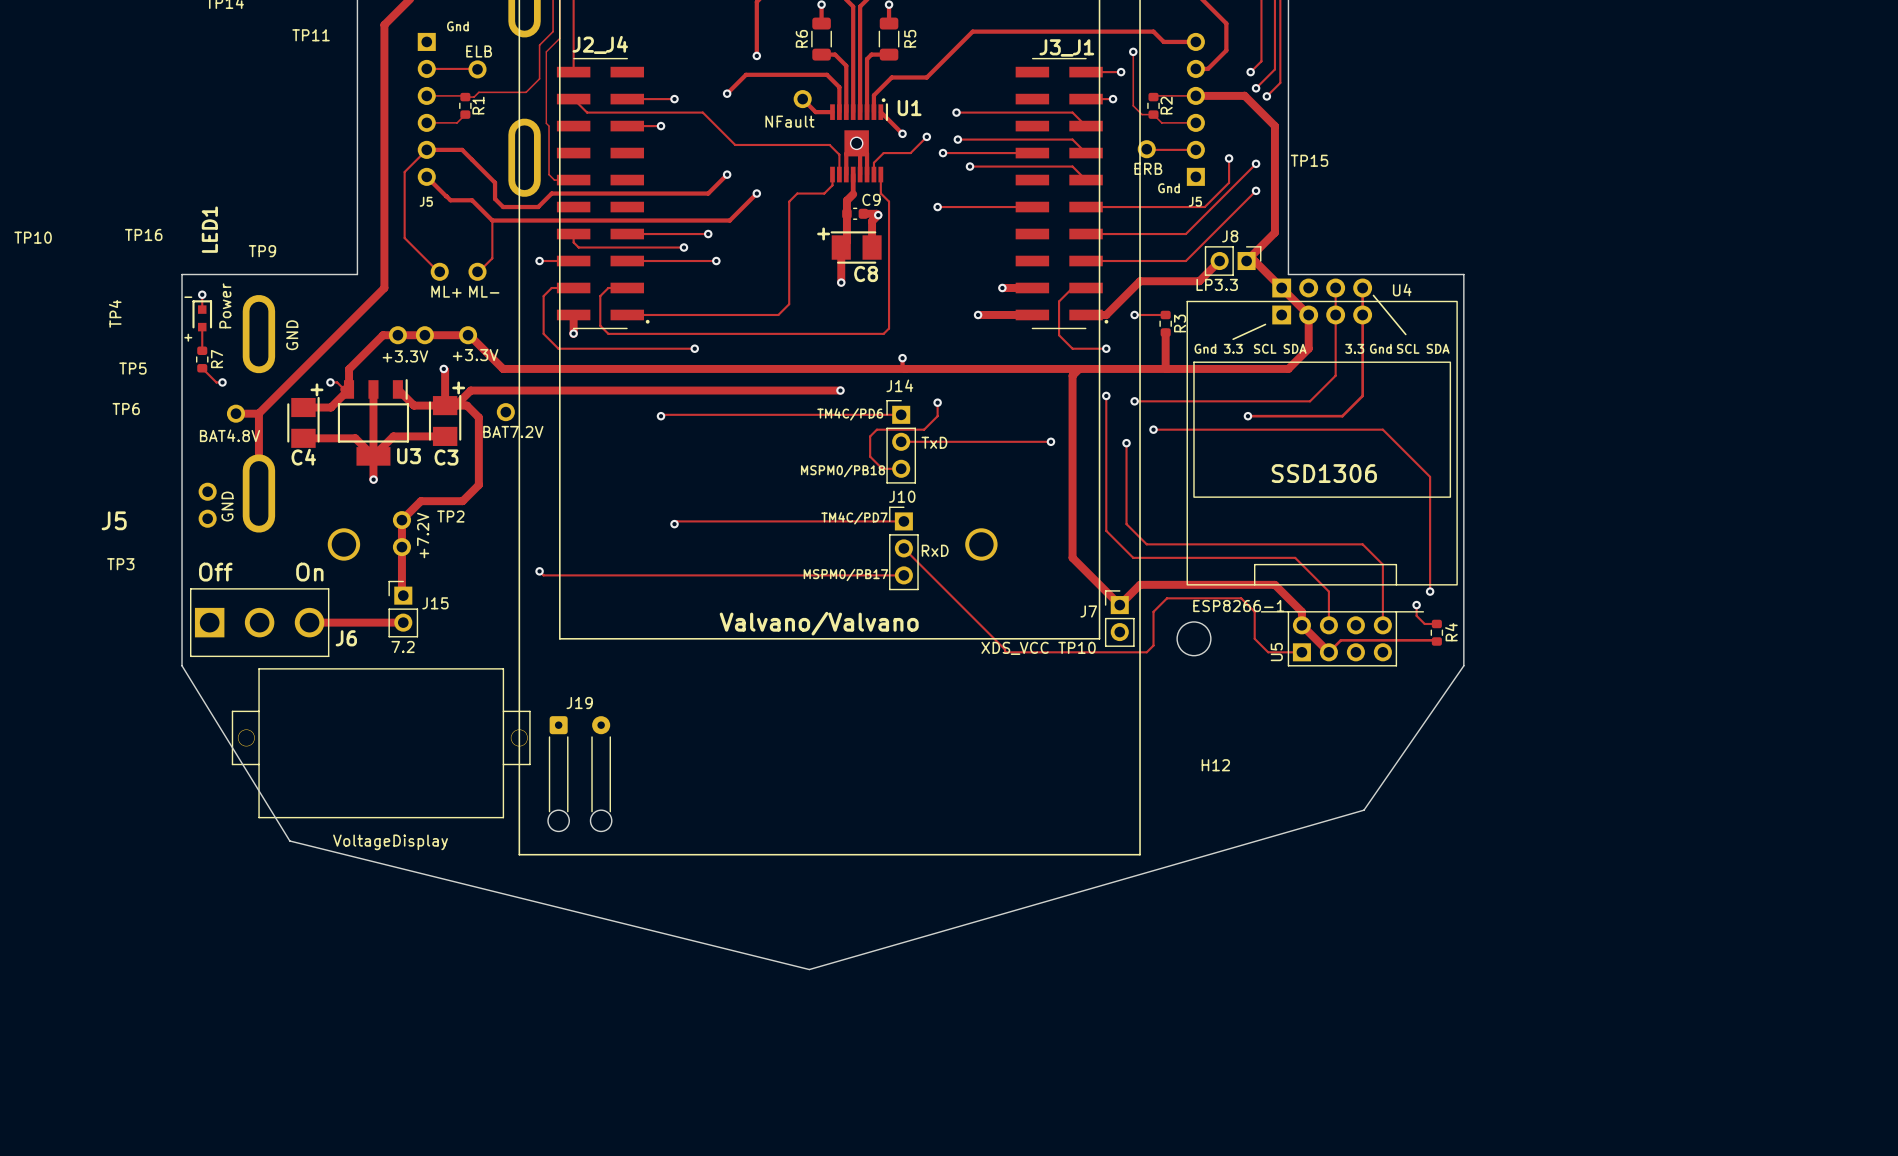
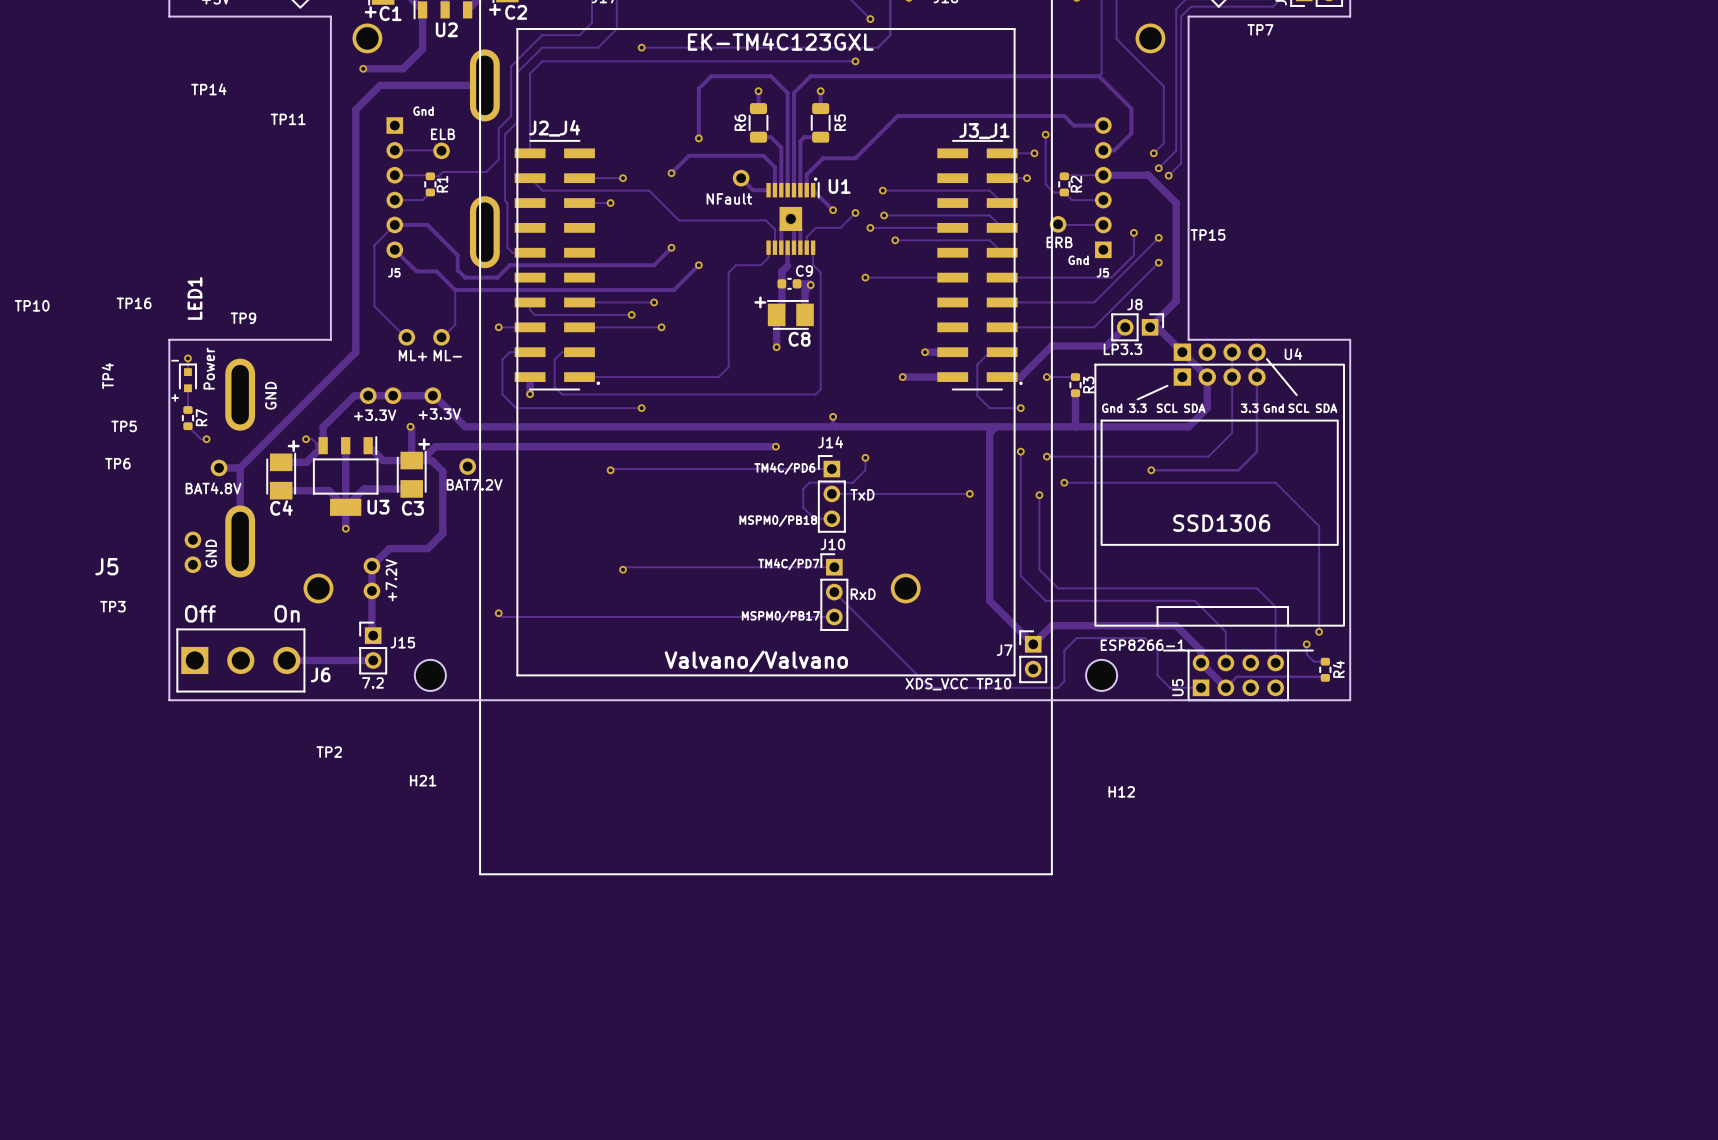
TP2 name position: TP2 (450, 516) -> TP2 (329, 752)
H21: none -> (430, 675)
board edge: (182, 665) (289, 840) (809, 969) (1363, 810) (1463, 665) -> (169, 700) (1350, 700)
VoltageDisplay: (381, 743) -> none
J19: (579, 773) -> none

